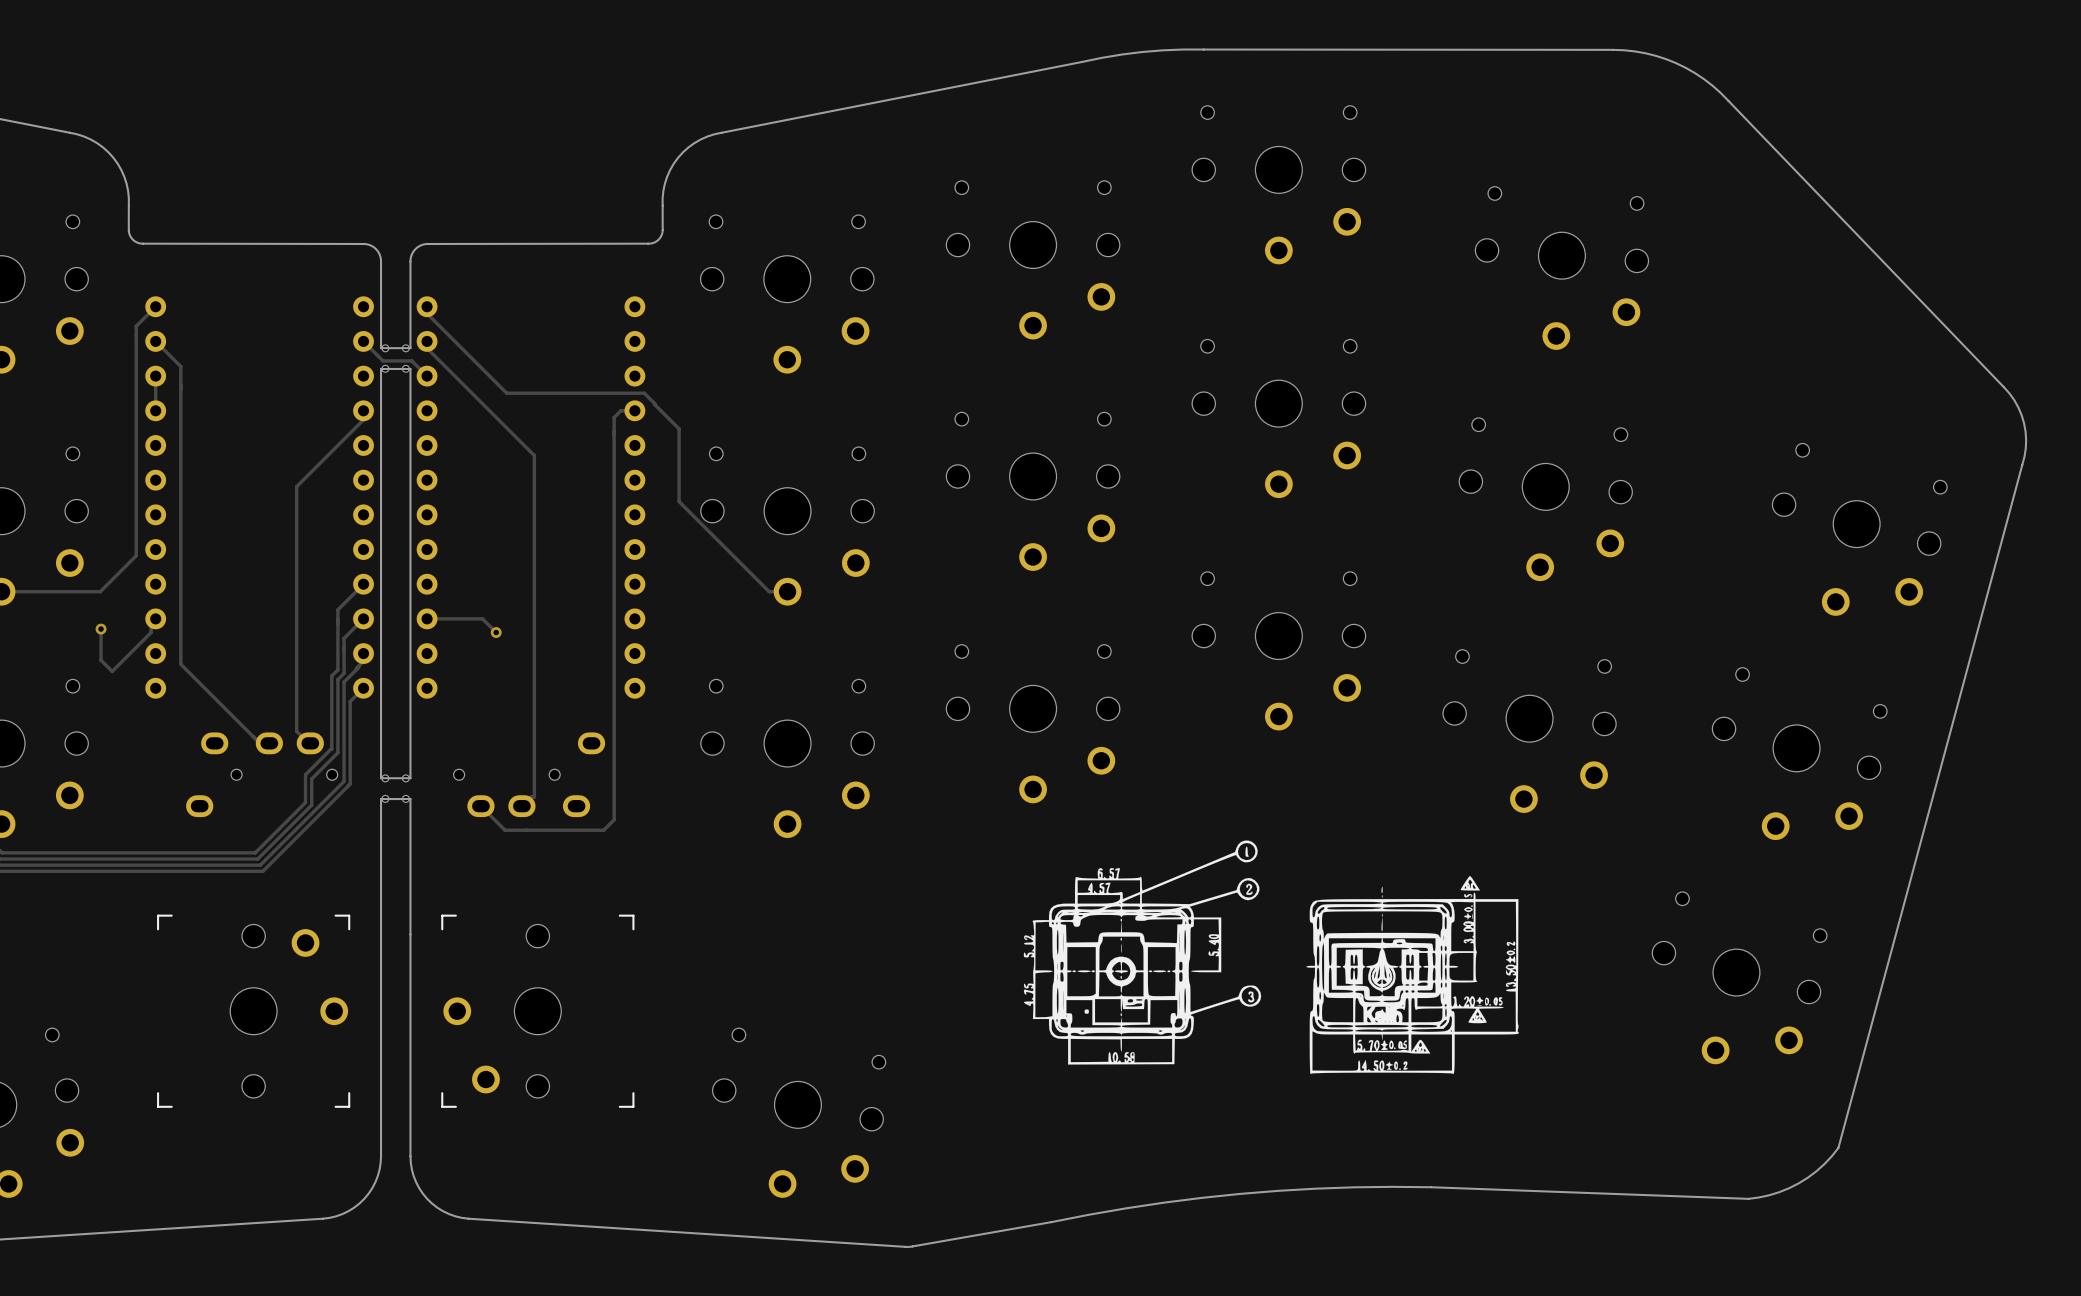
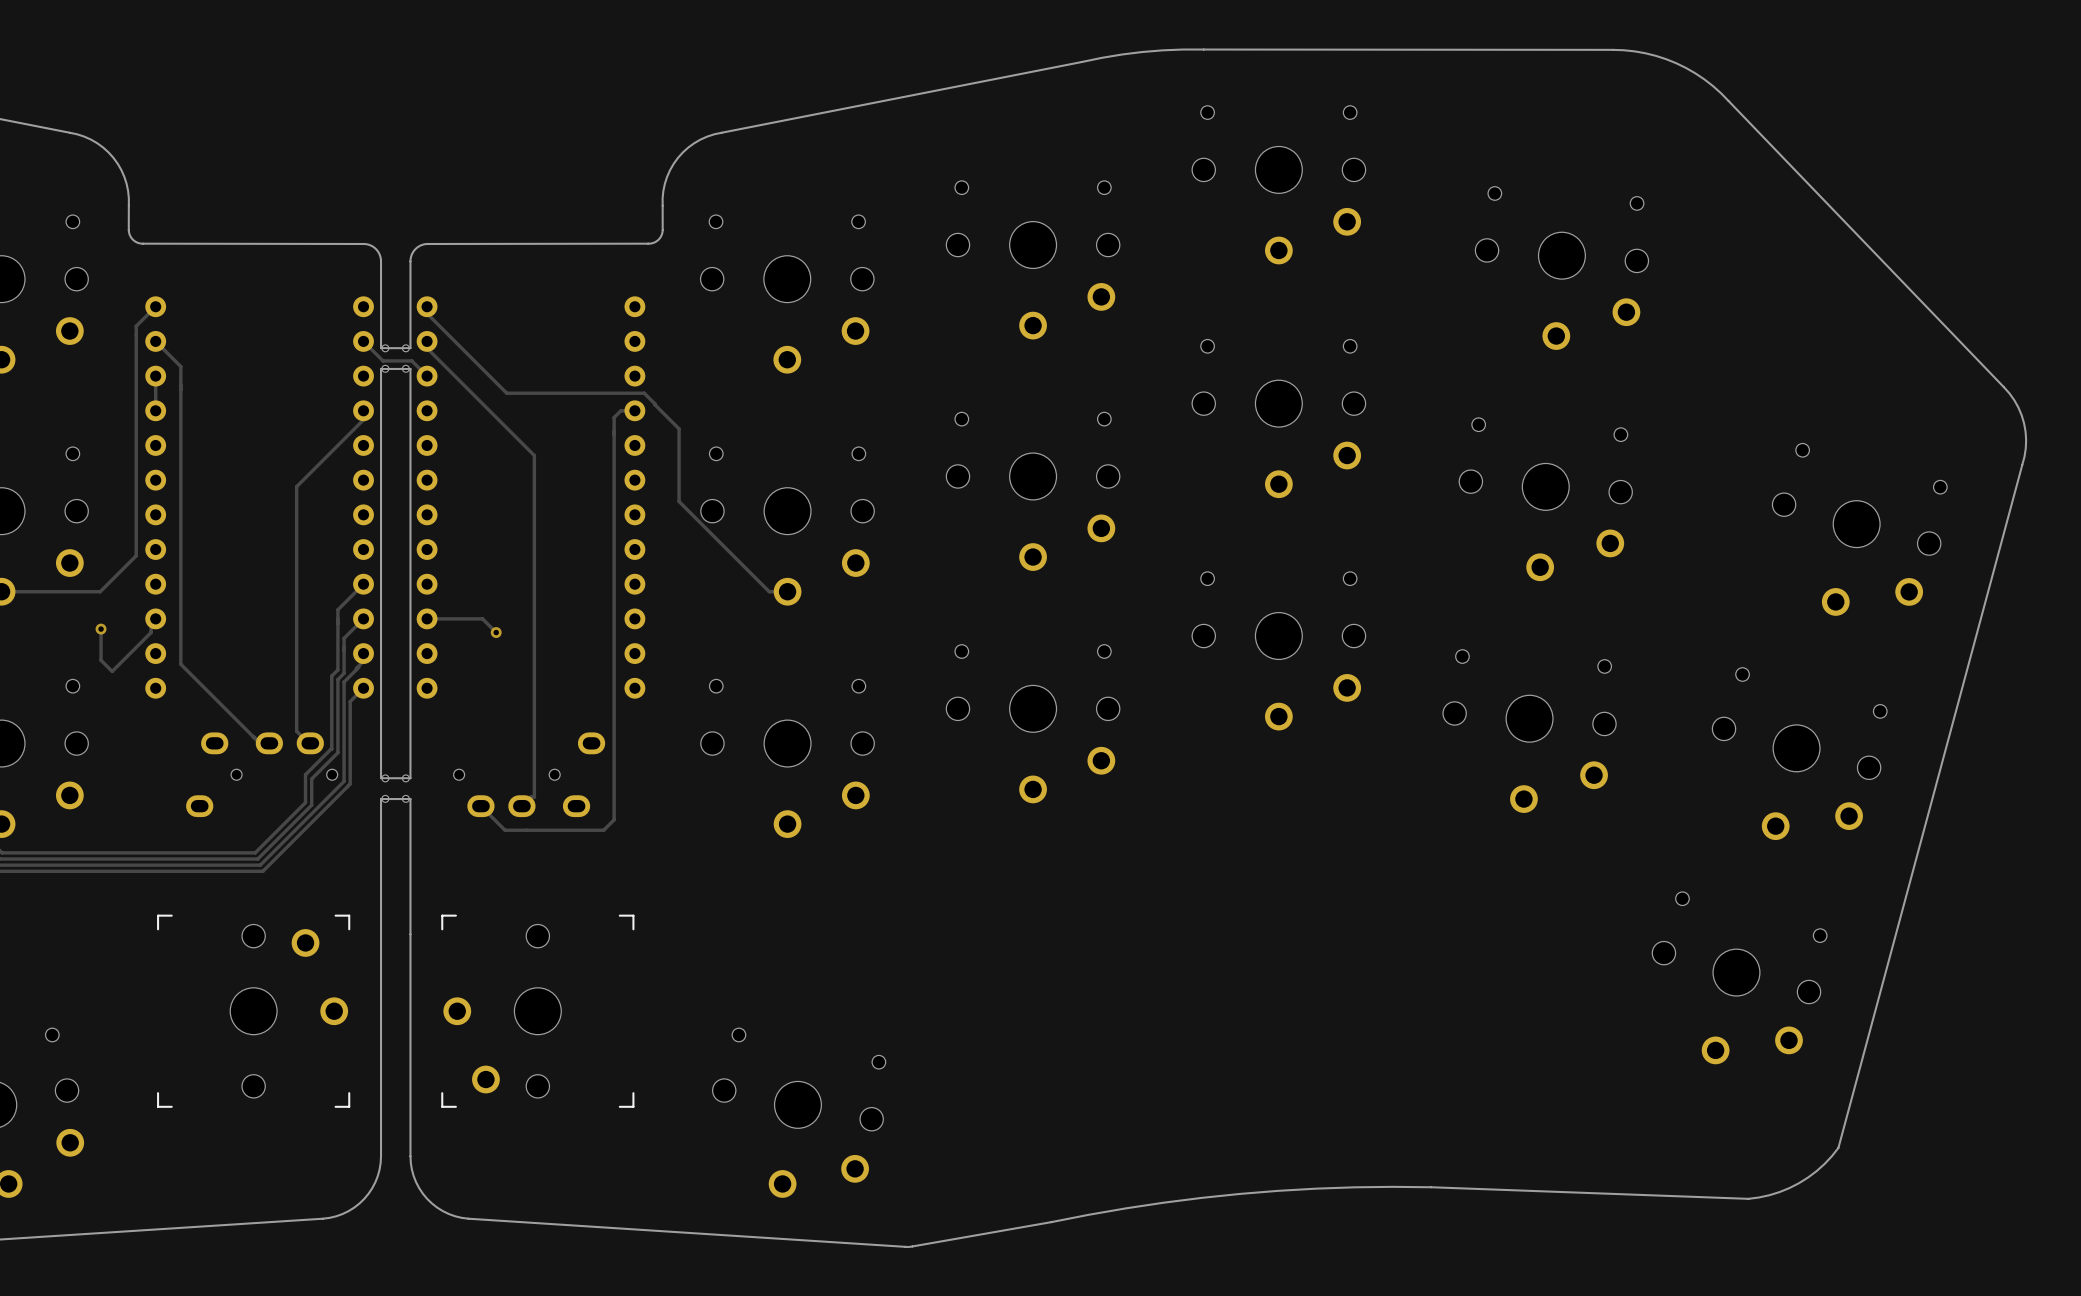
drawing: [1023, 840, 1262, 1065] -> none
drawing: [1306, 875, 1519, 1075] -> none

